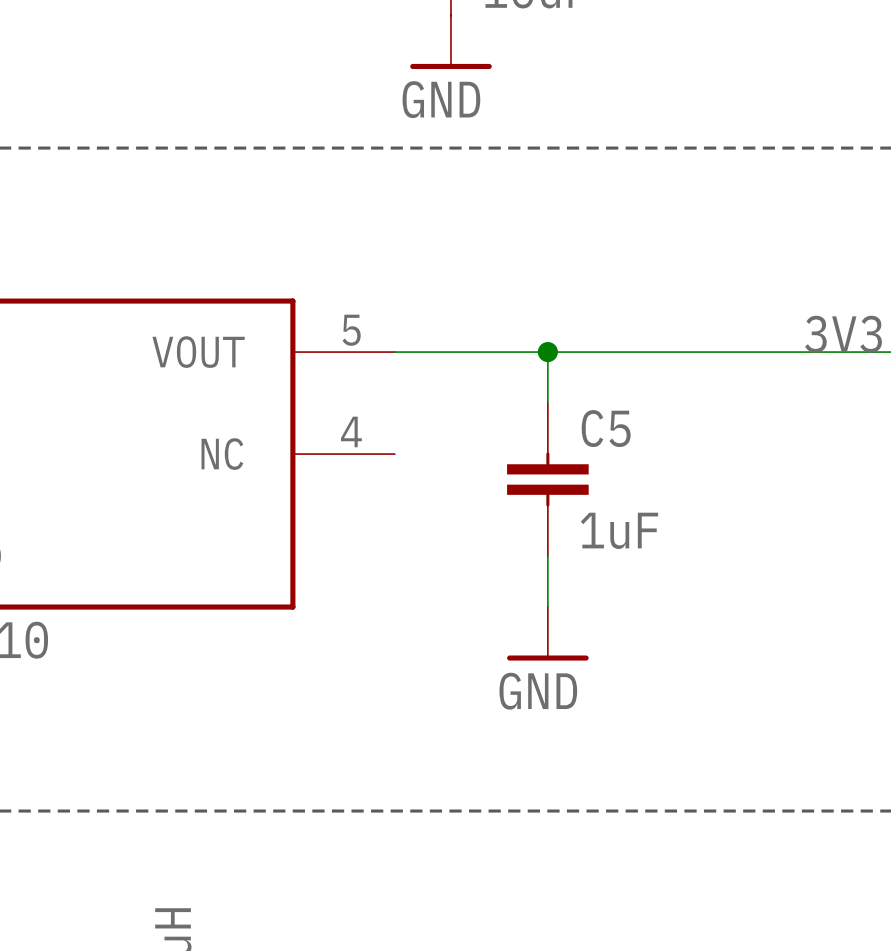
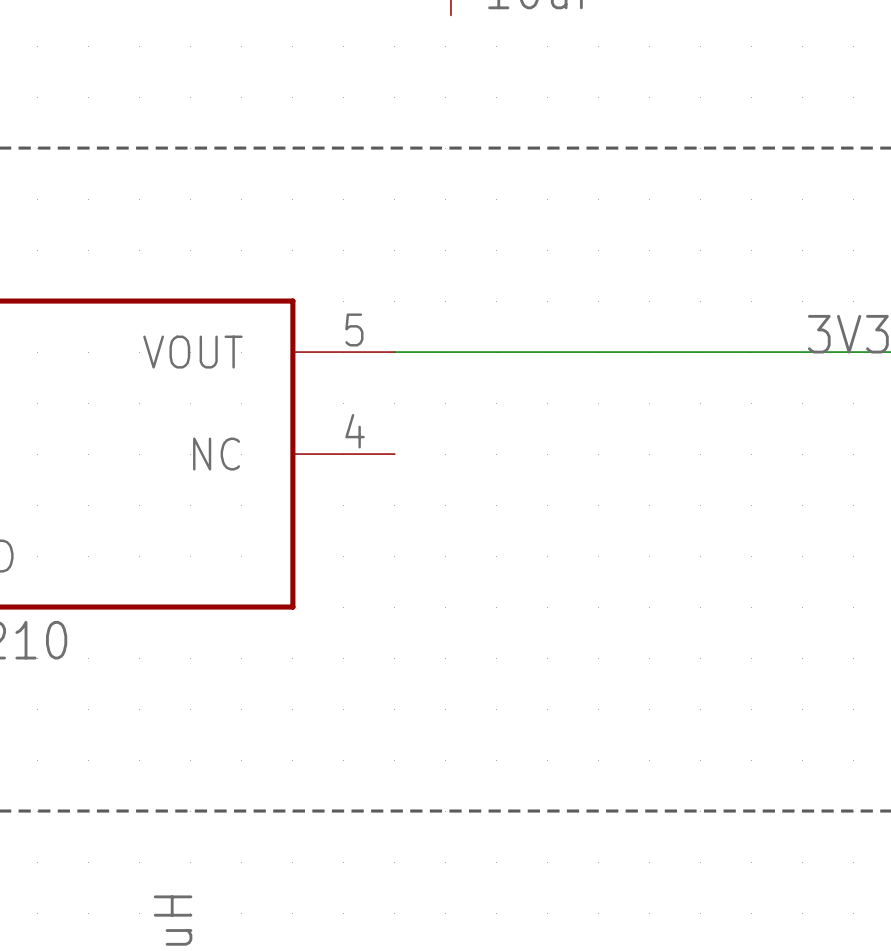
power symbol: GND (450, 42) -> none
wire: (547, 352) (547, 403) -> none
junction: (547, 352) -> none
C5: 1uF (547, 479) -> none
wire: (547, 556) (547, 607) -> none
power symbol: GND (547, 633) -> none

